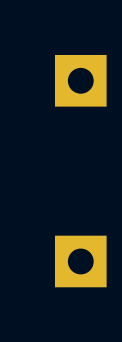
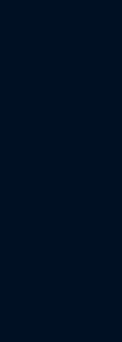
part: (80, 80) -> none
part: (80, 261) -> none

